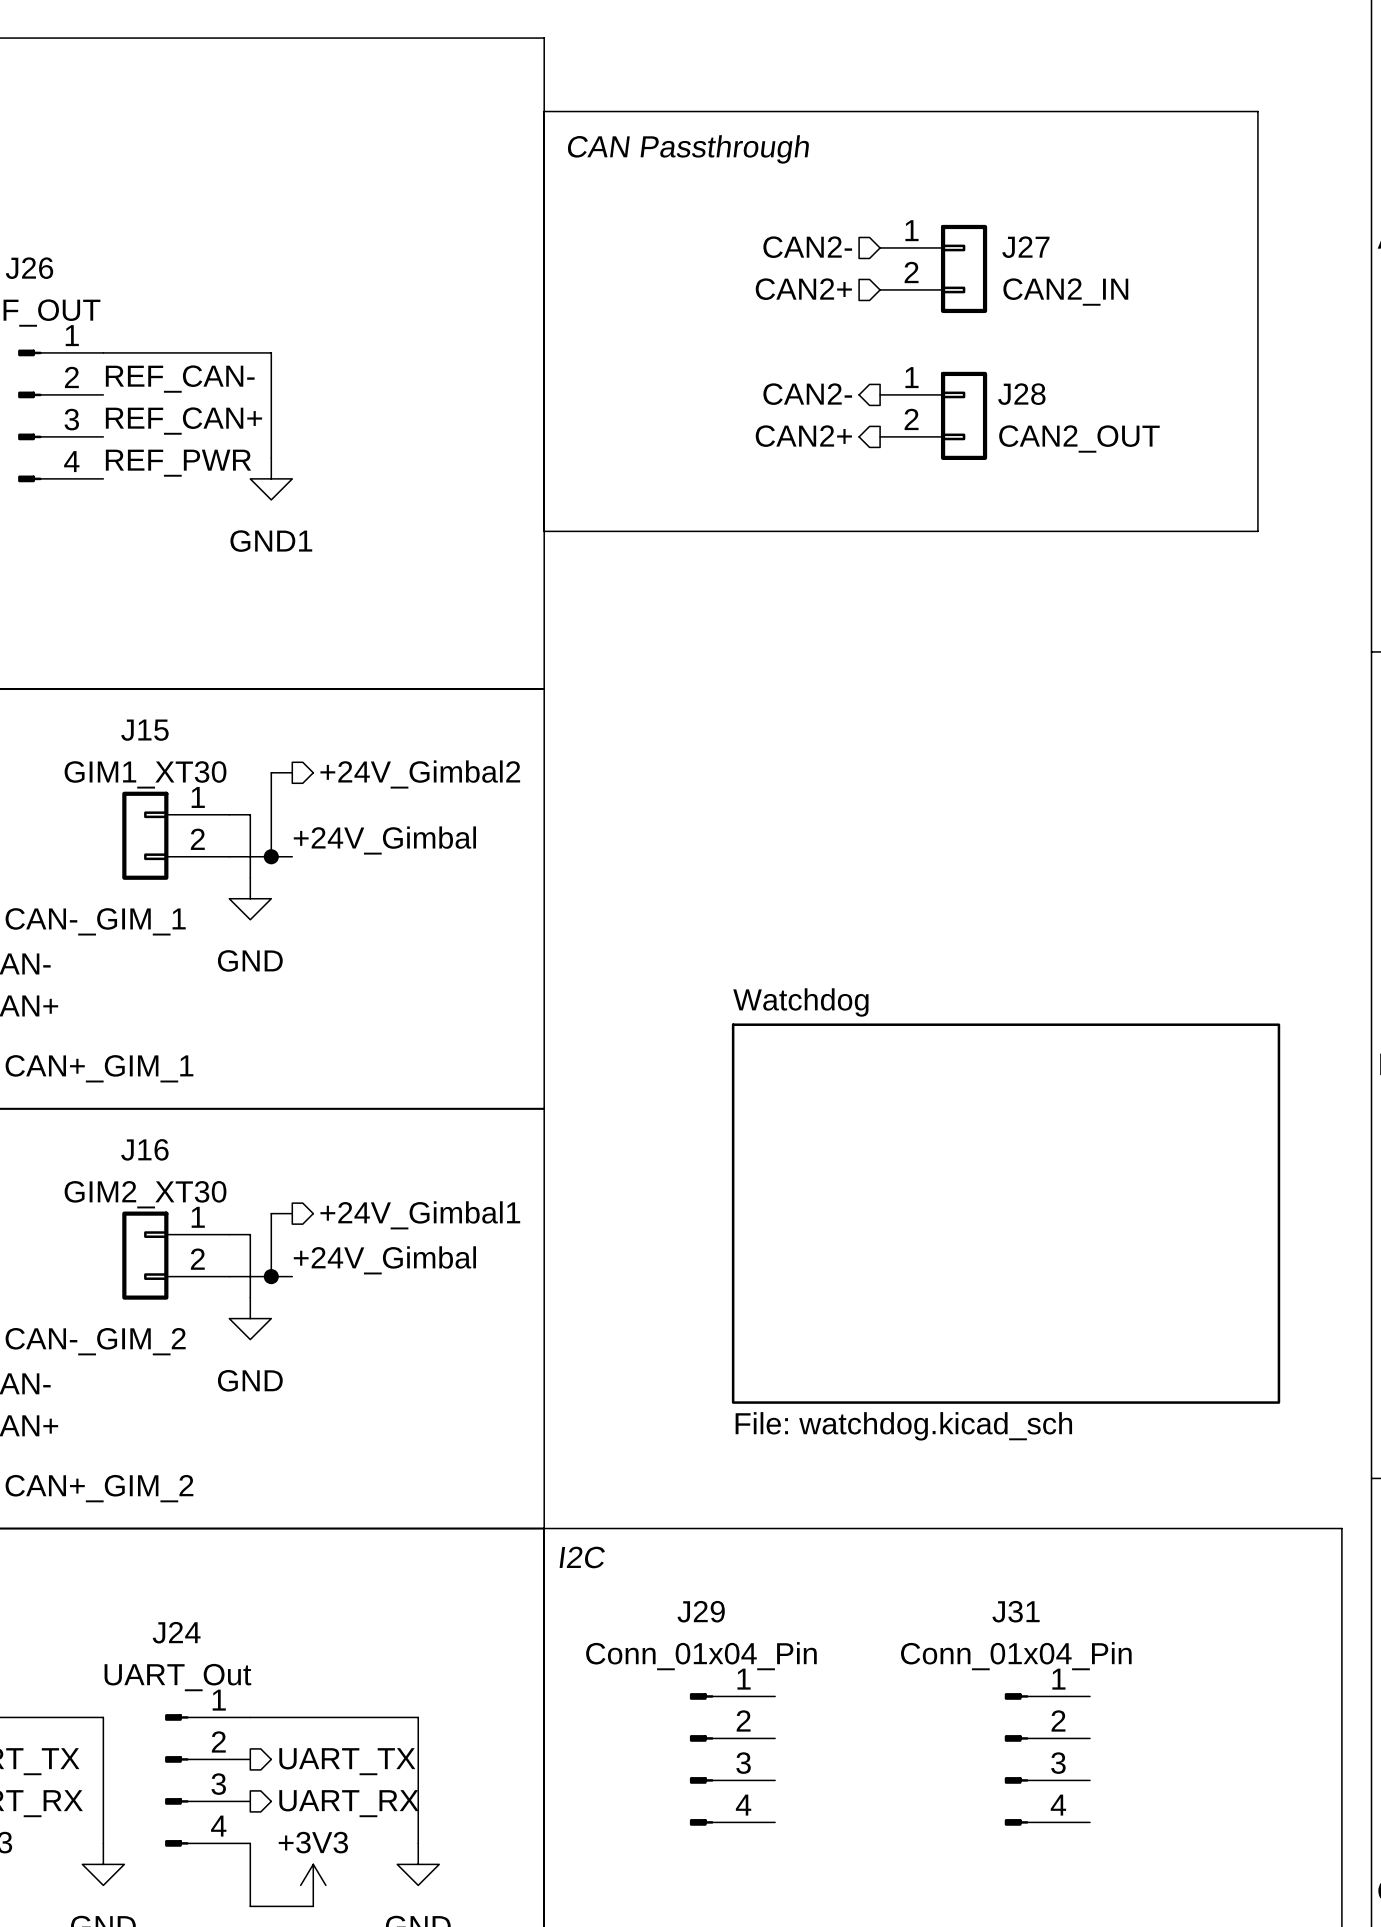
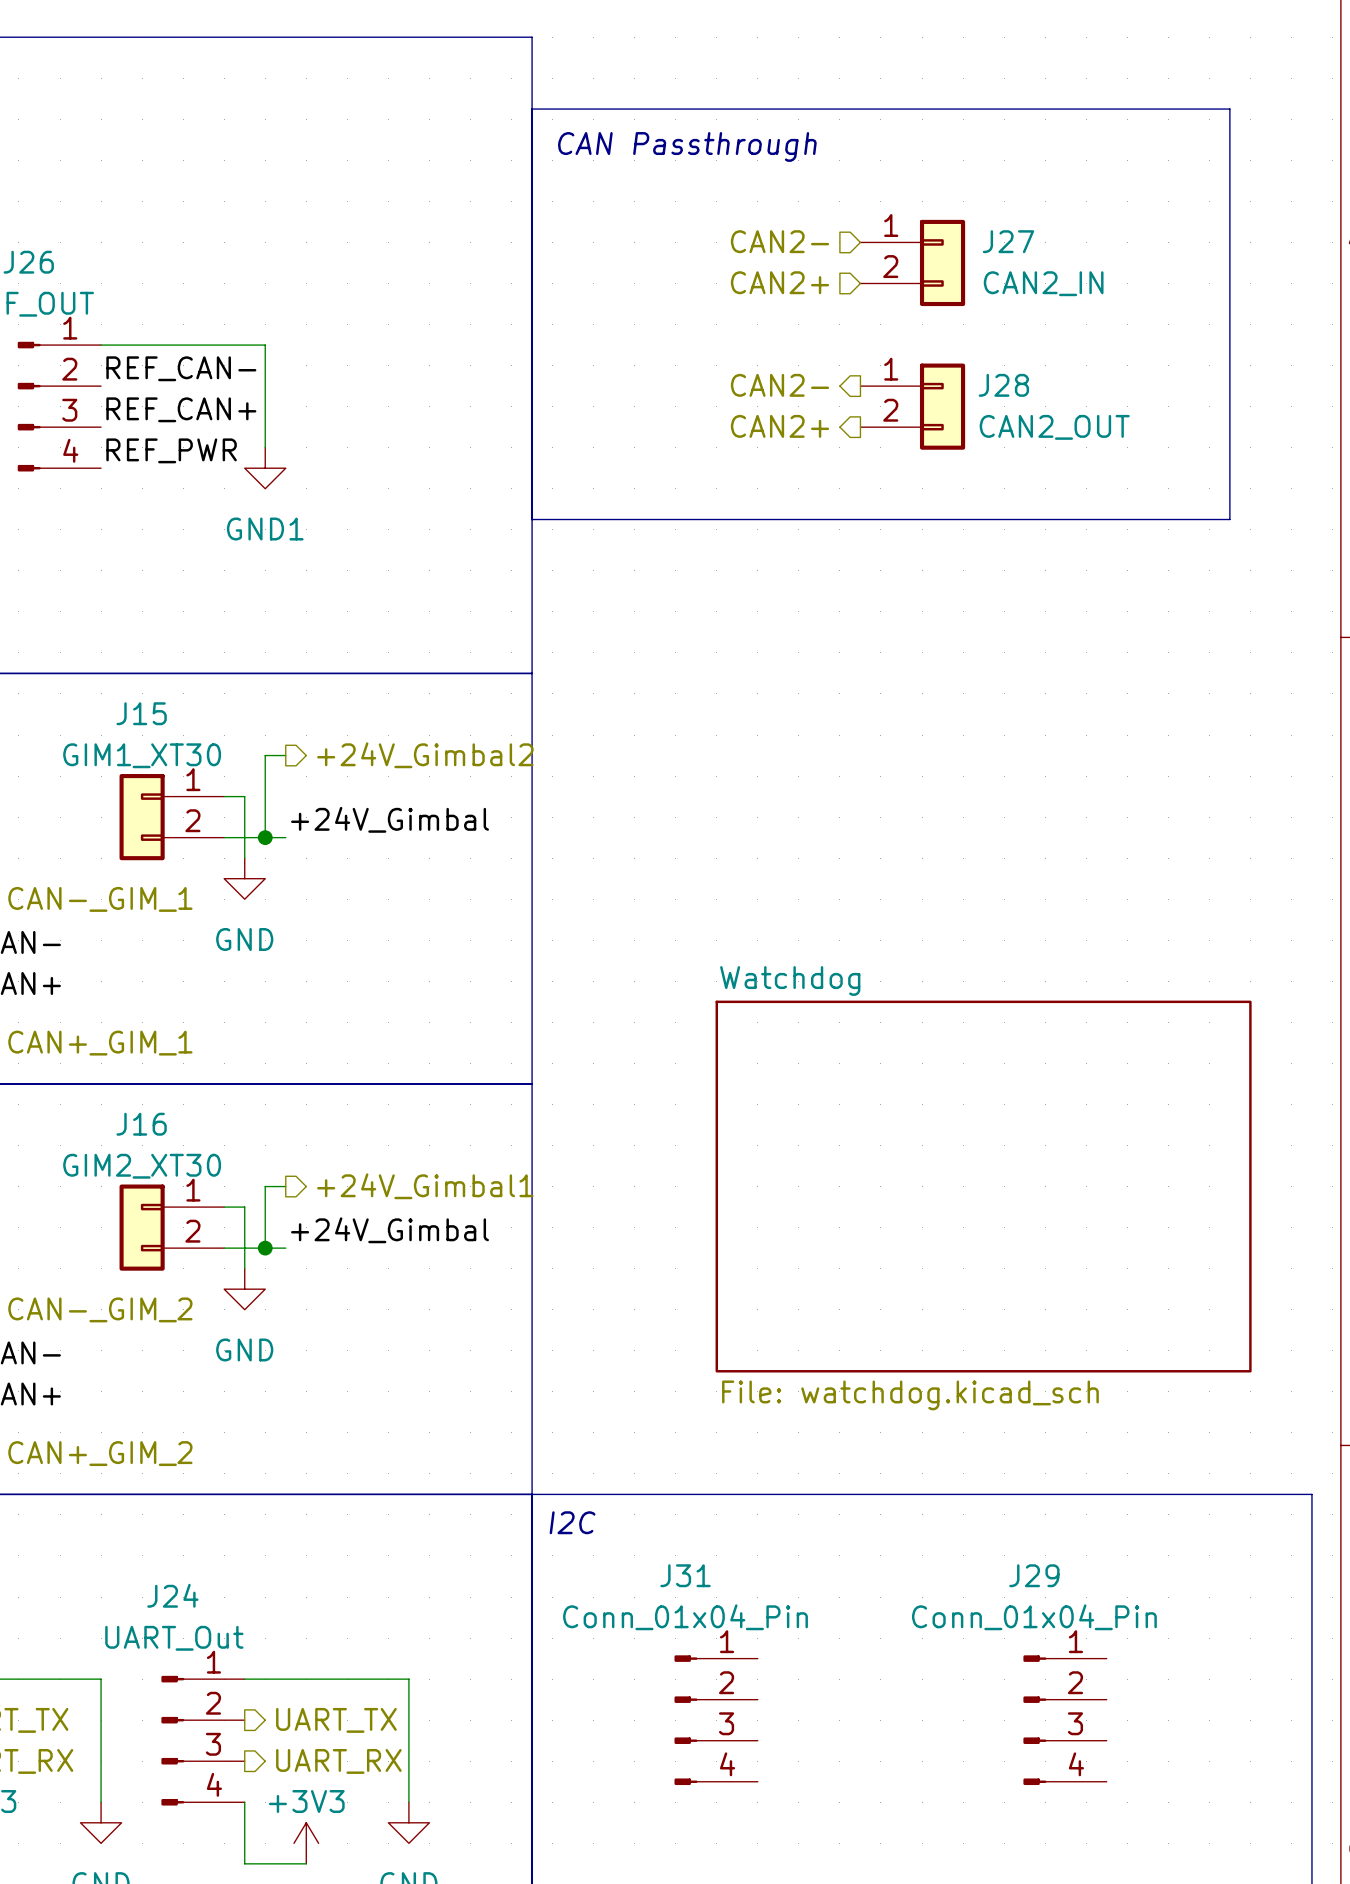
J29 name: J29 (701, 1611) -> J31 (685, 1575)
J31: Conn_01x04_Pin (1047, 1759) -> none
J29: none -> Conn_01x04_Pin (1065, 1720)

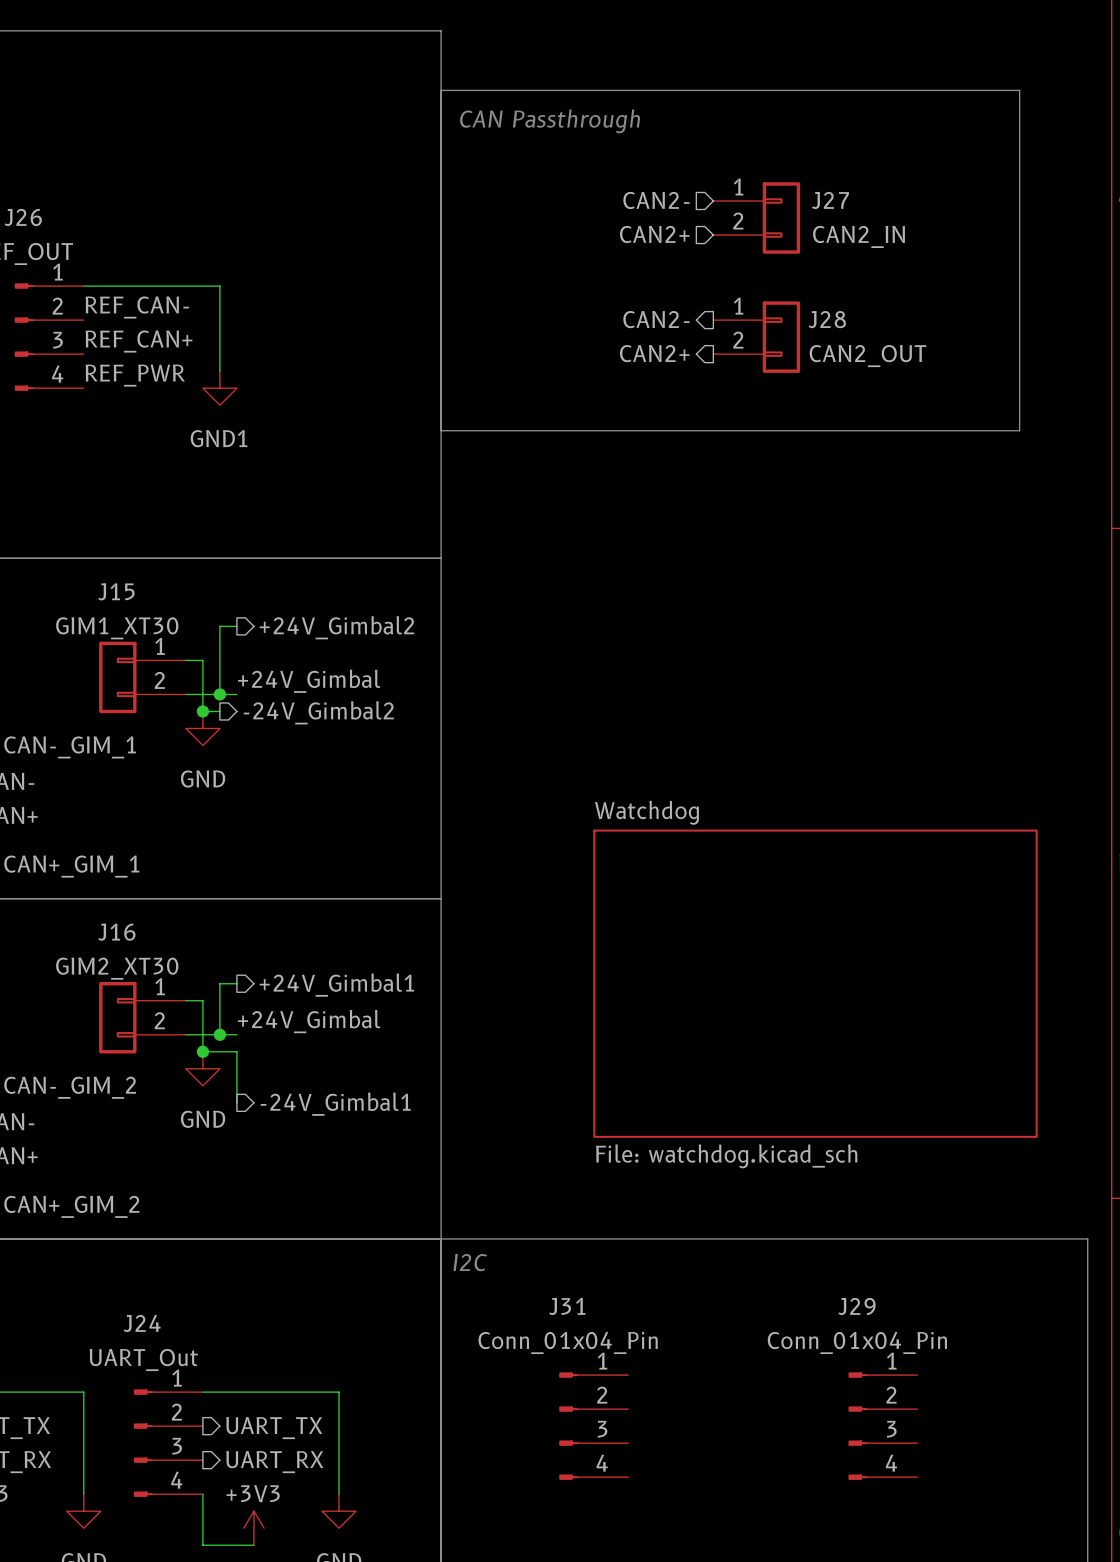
hierarchical label: none -> -24V_Gimbal2 (318, 712)
wire: none -> (202, 711) (219, 711)
junction: none -> (202, 711)
wire: none -> (202, 1051) (236, 1051) (236, 1102)
junction: none -> (202, 1051)
hierarchical label: none -> -24V_Gimbal1 (335, 1104)

